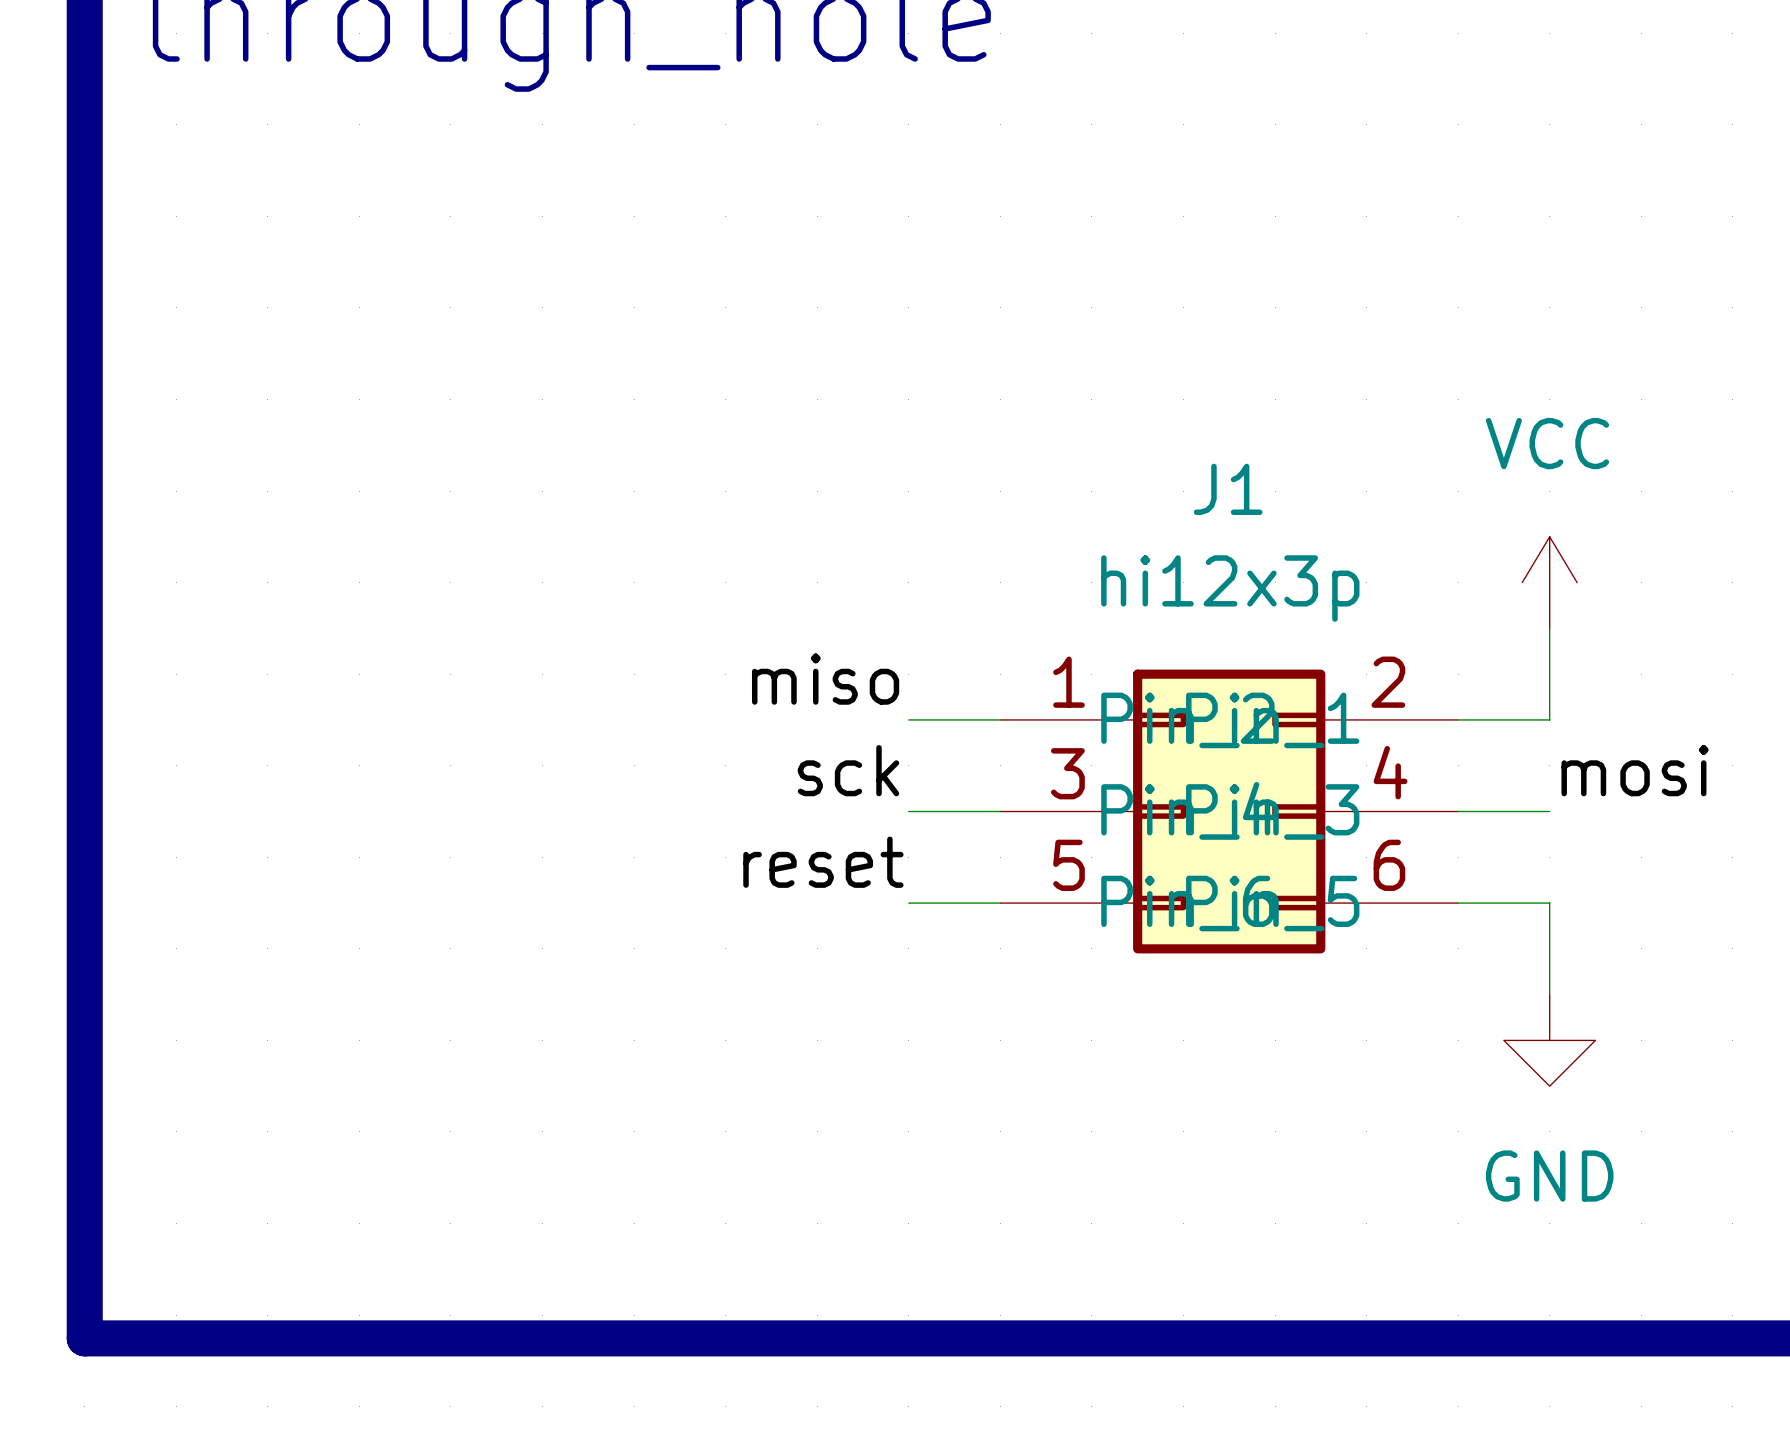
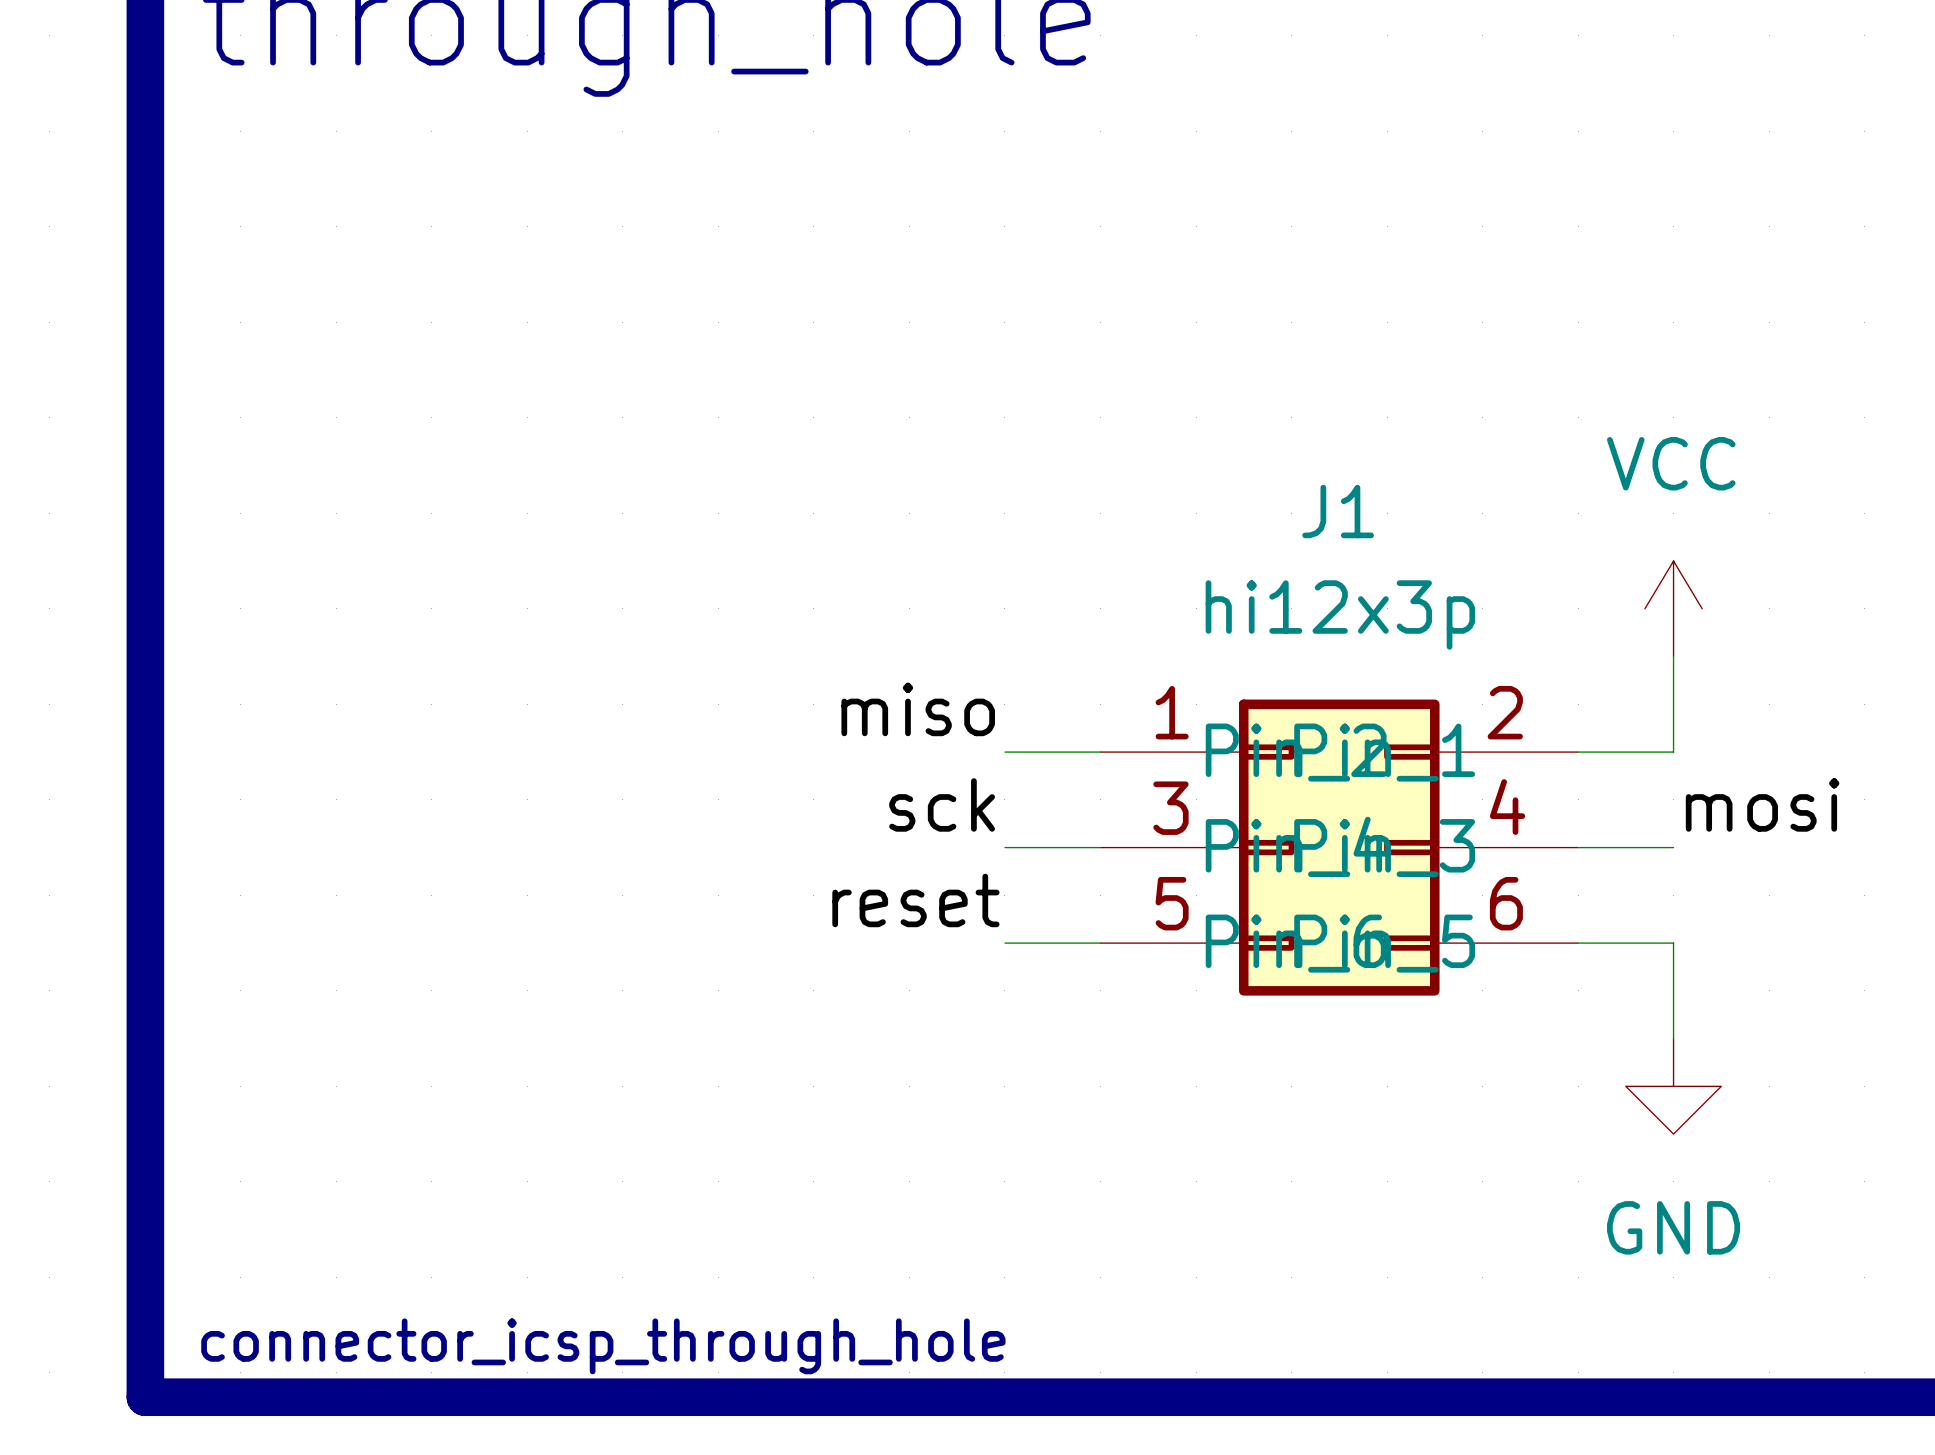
text: none -> connector_icsp_through_hole (603, 1346)

